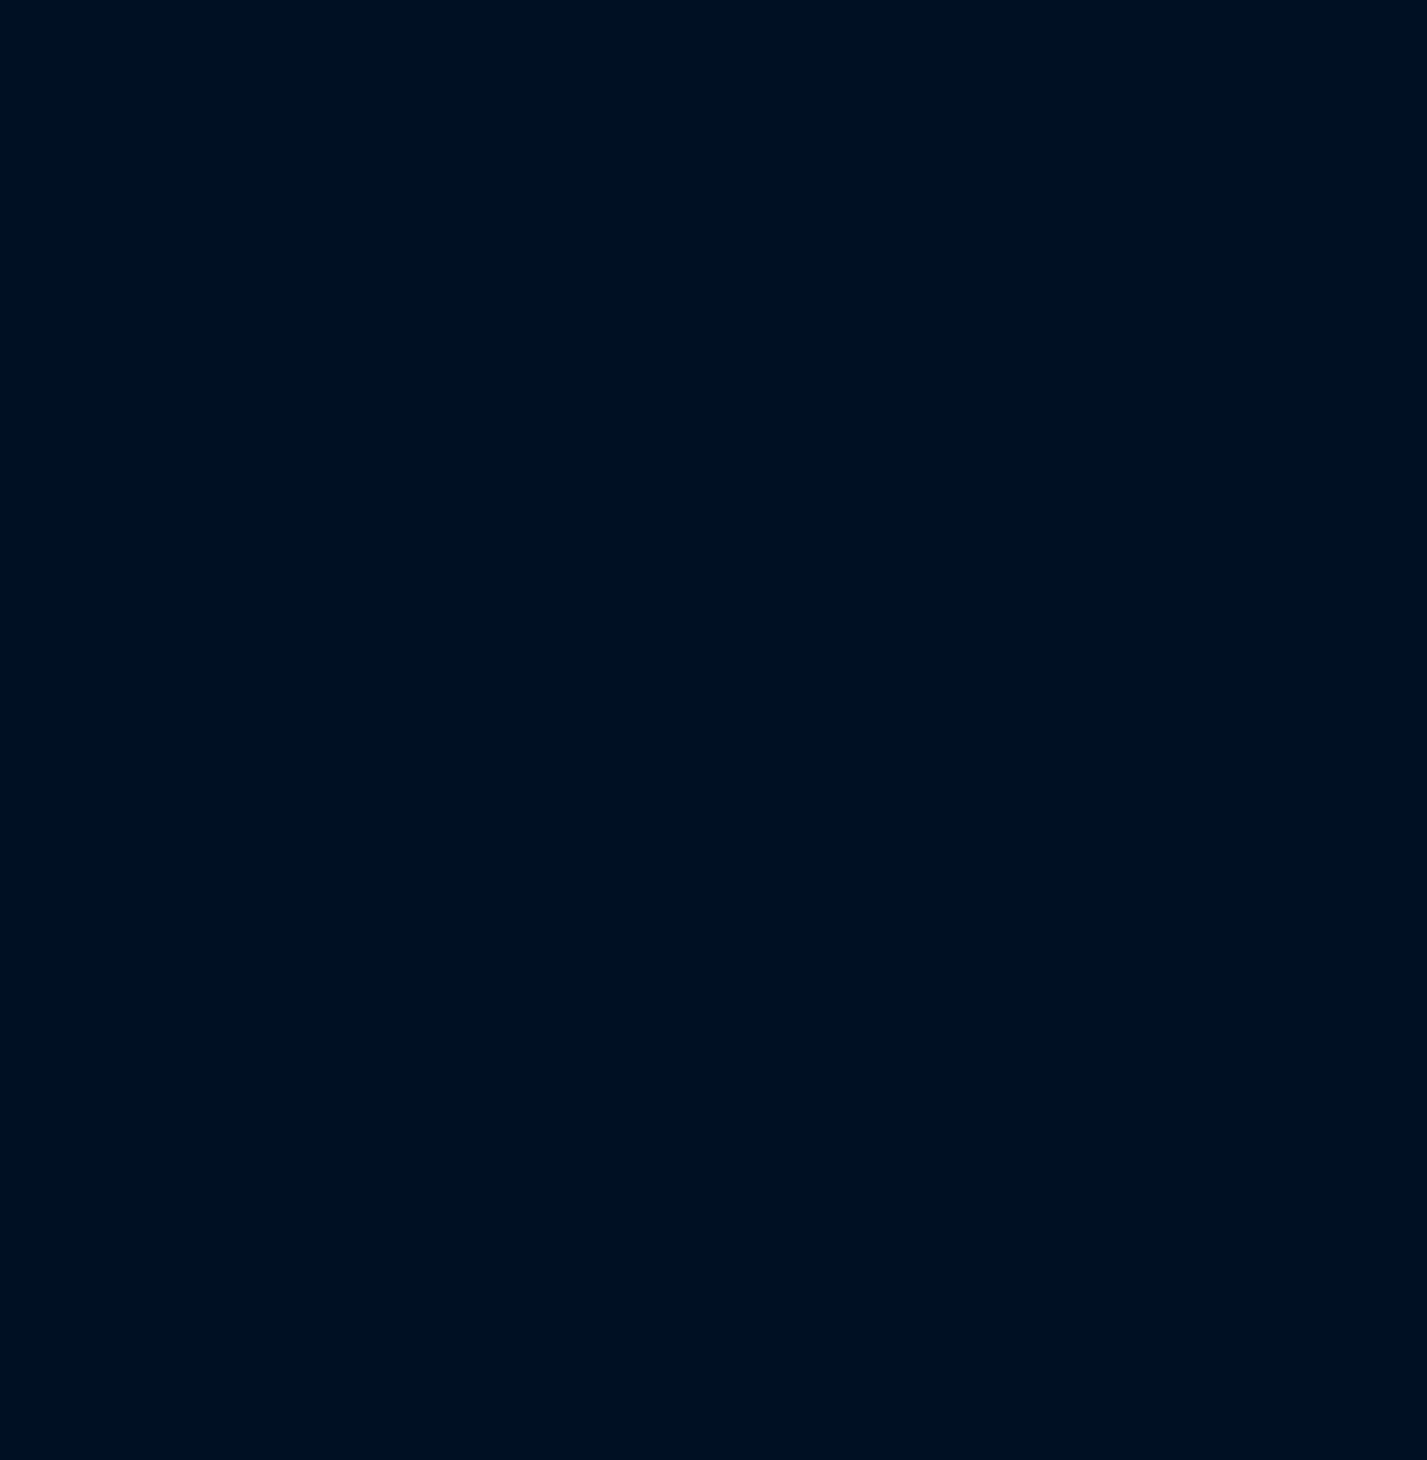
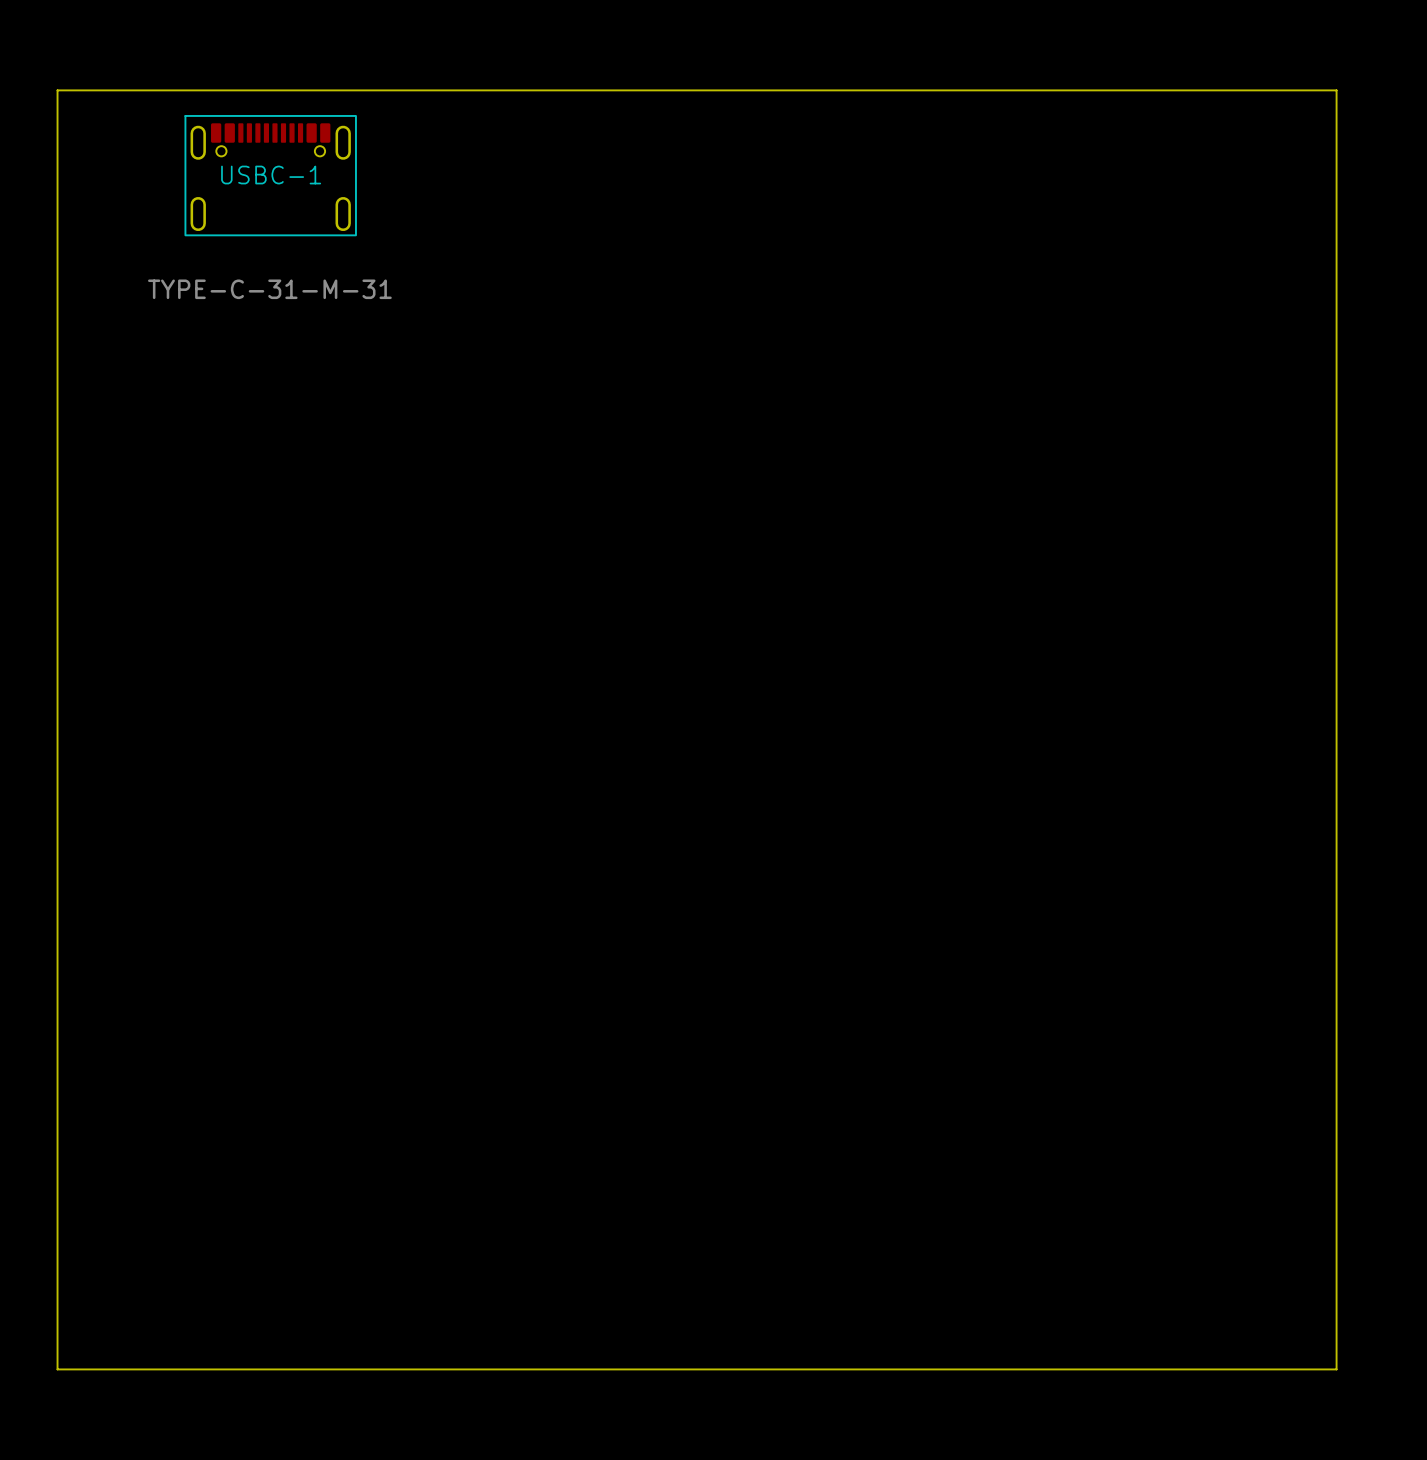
board edge: none -> (57, 90) (1336, 90) (1336, 1369) (57, 1369) (57, 90)
USBC-1: none -> TYPE-C-31-M-31 (270, 175)

